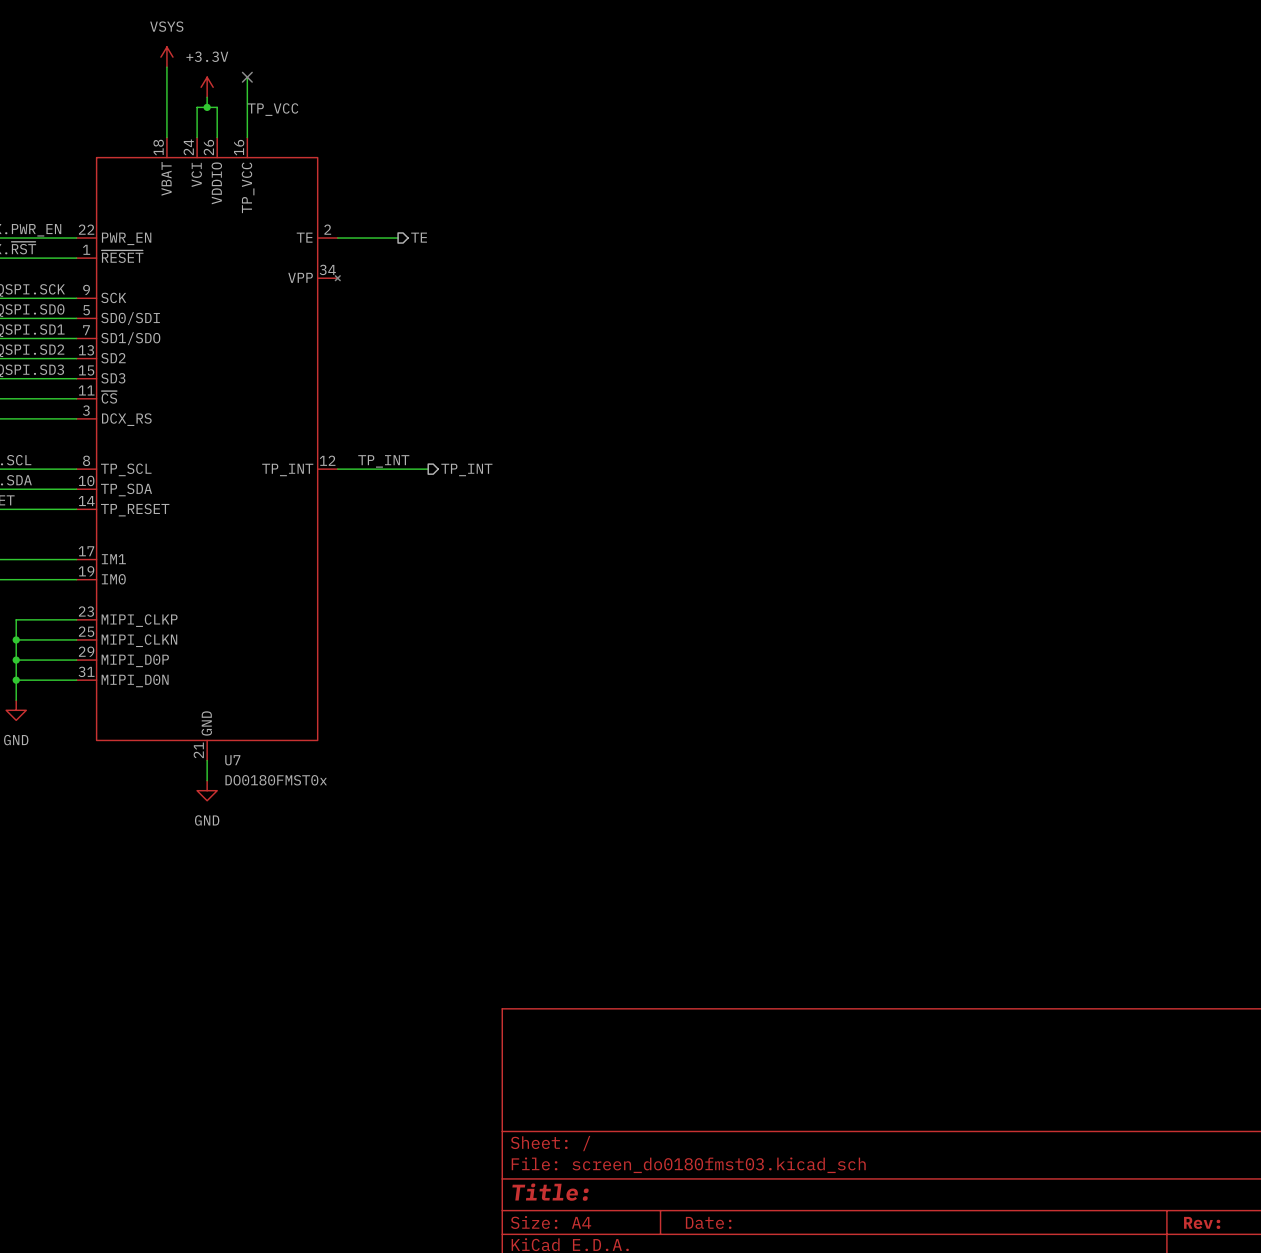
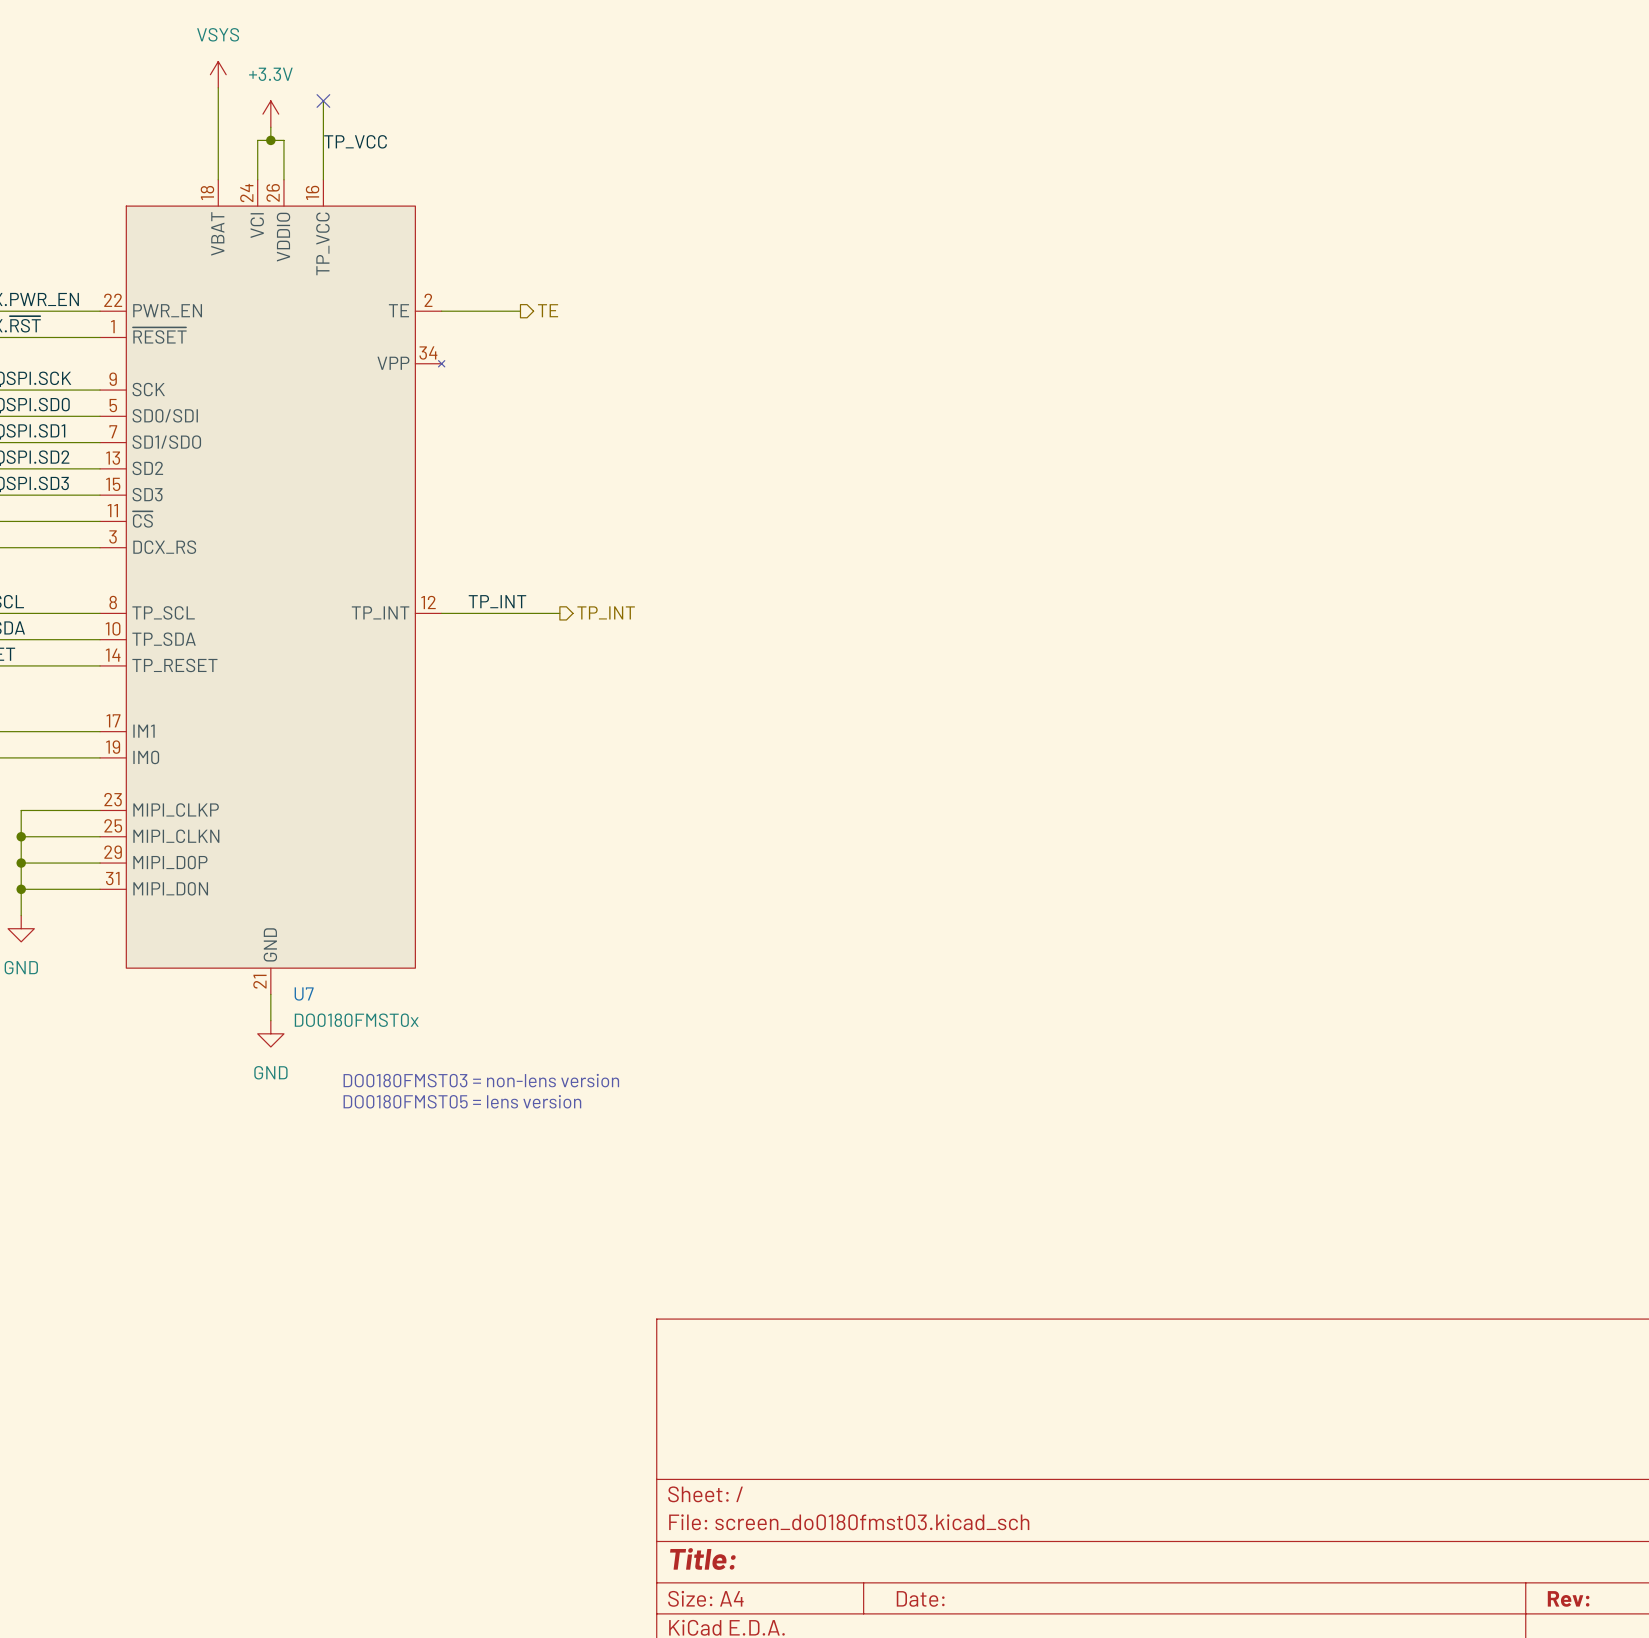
text: none -> DO0180FMST03 = non-lens version (481, 1080)
text: none -> DO0180FMST05 = lens version (462, 1101)

